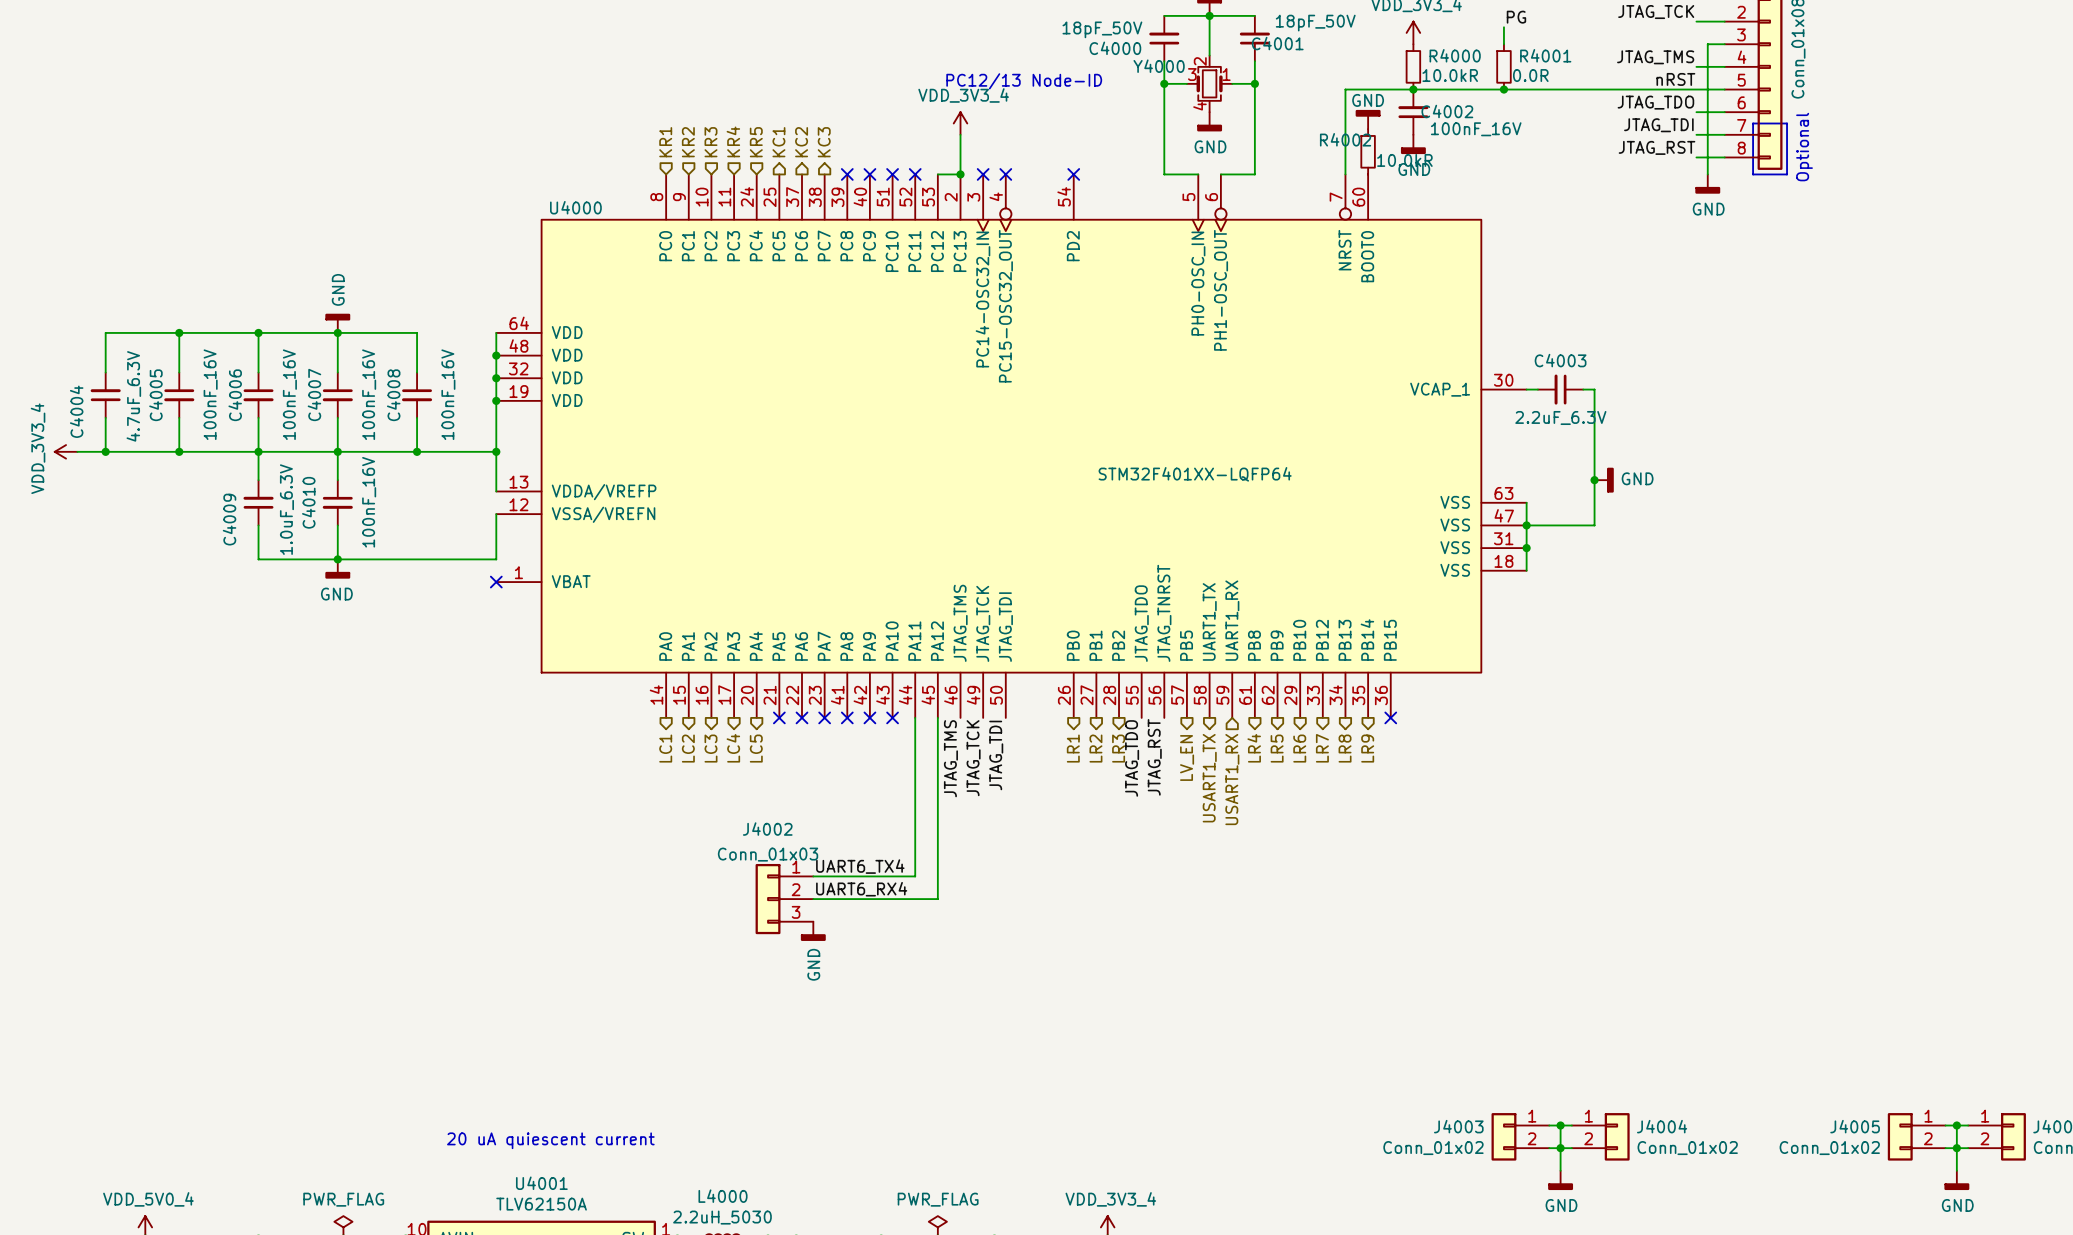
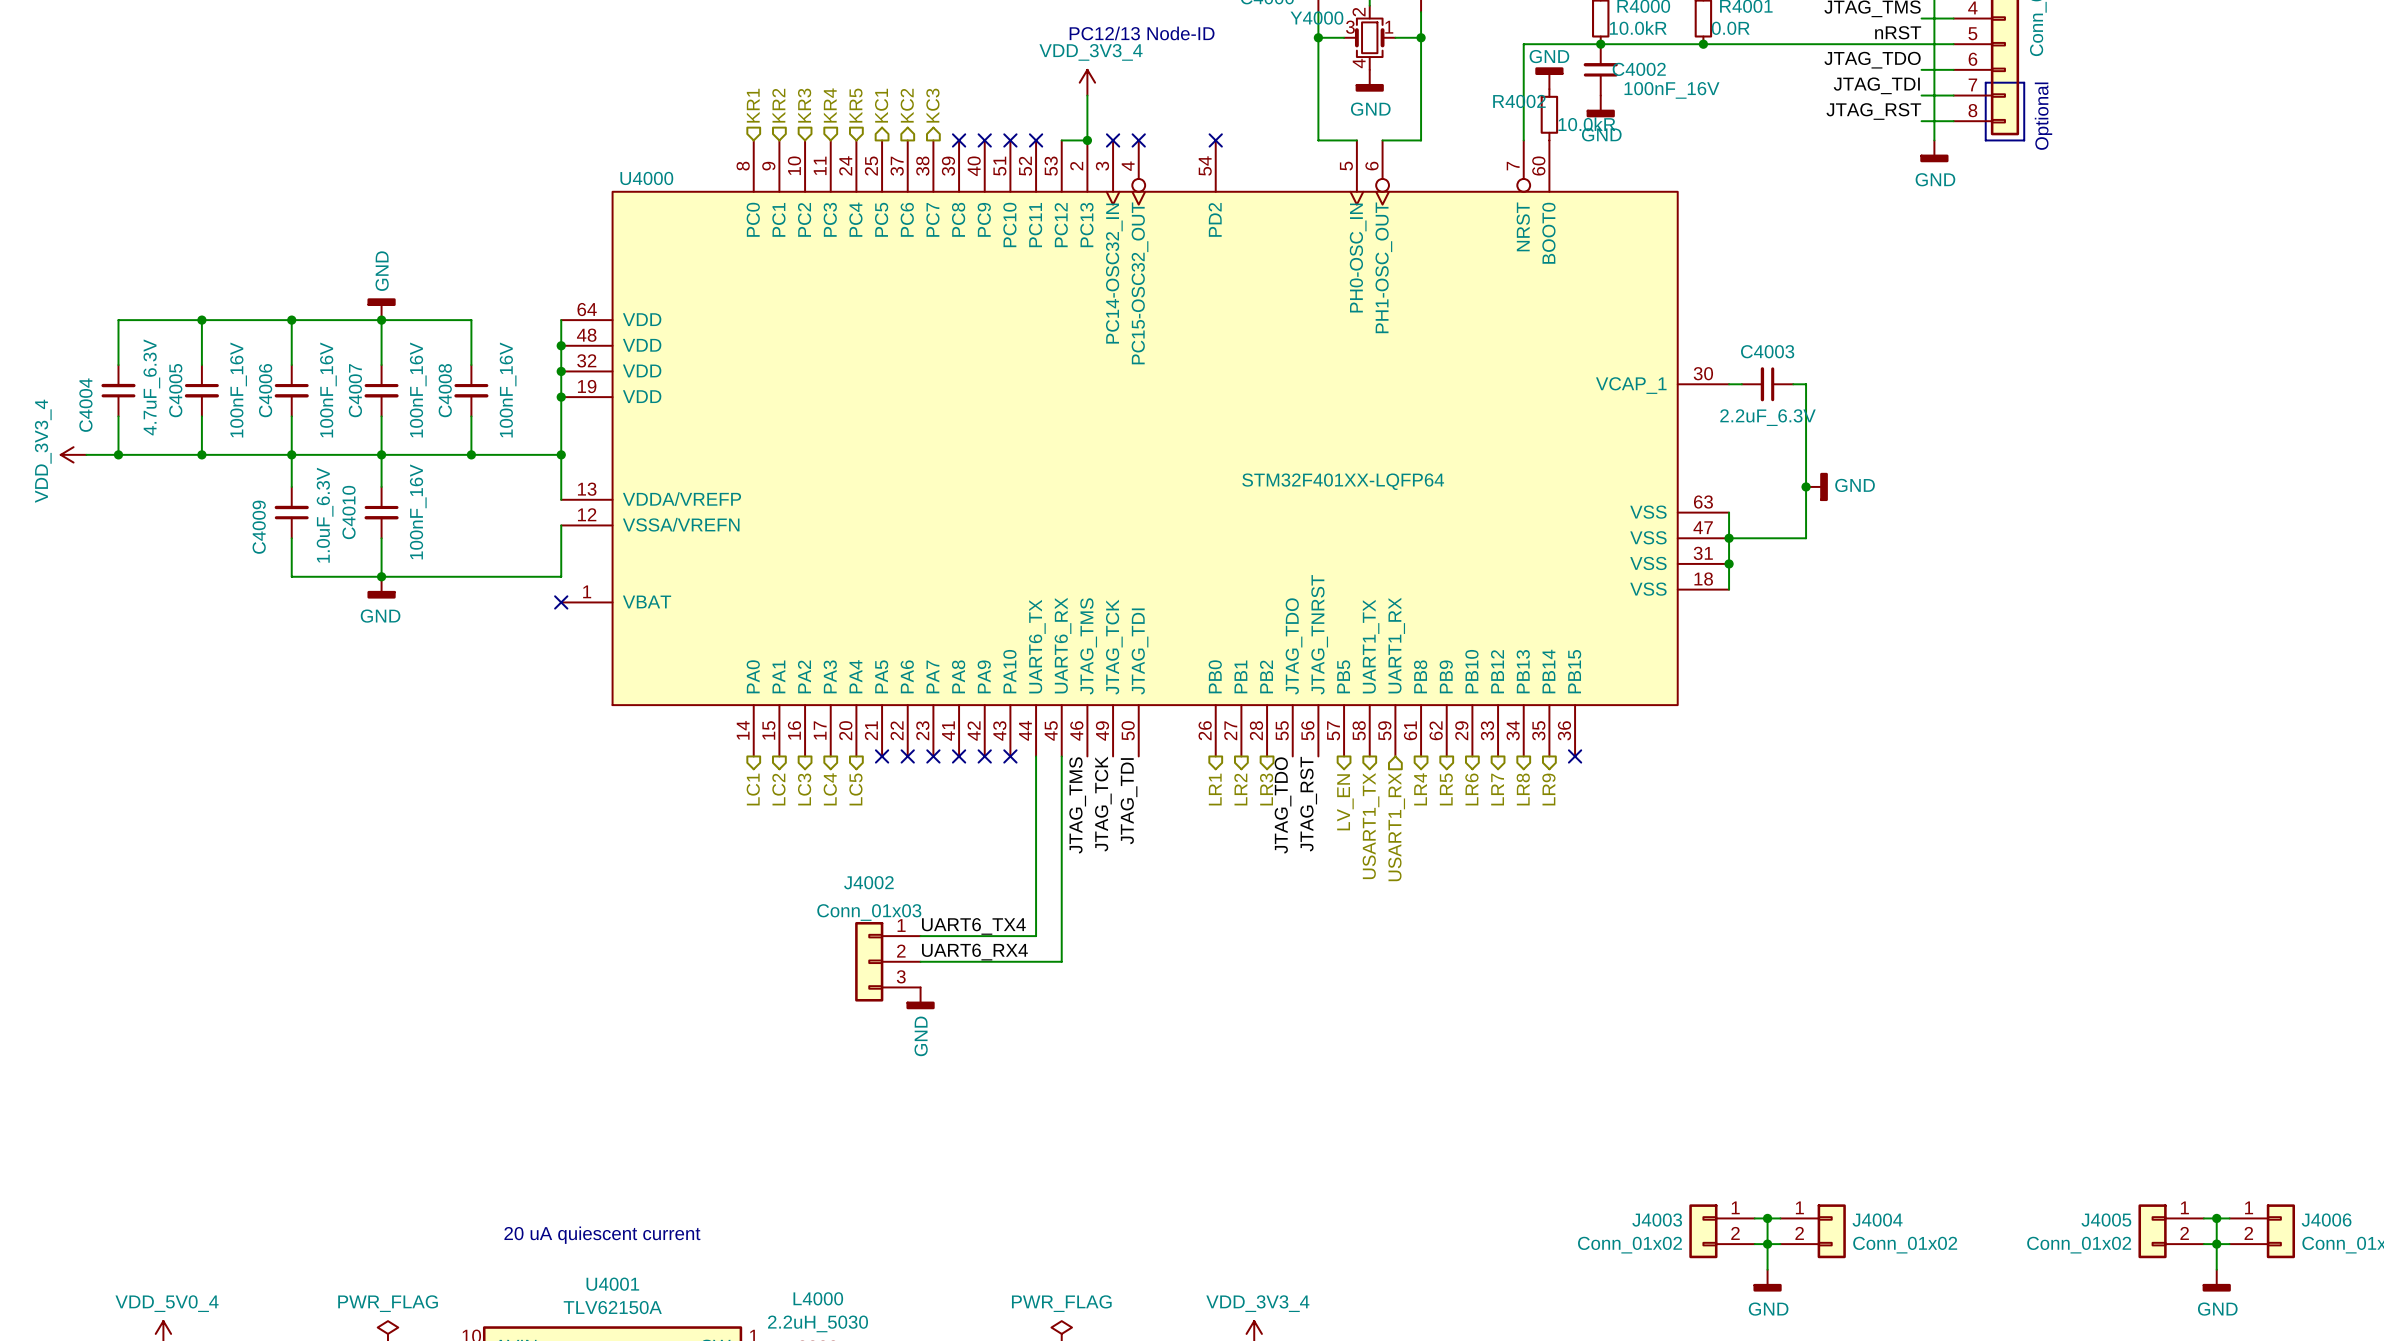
U4000 pin name: PA11 (914, 641) -> UART6_TX (1037, 646)
U4000 pin name: PA12 (937, 641) -> UART6_RX (1063, 645)

